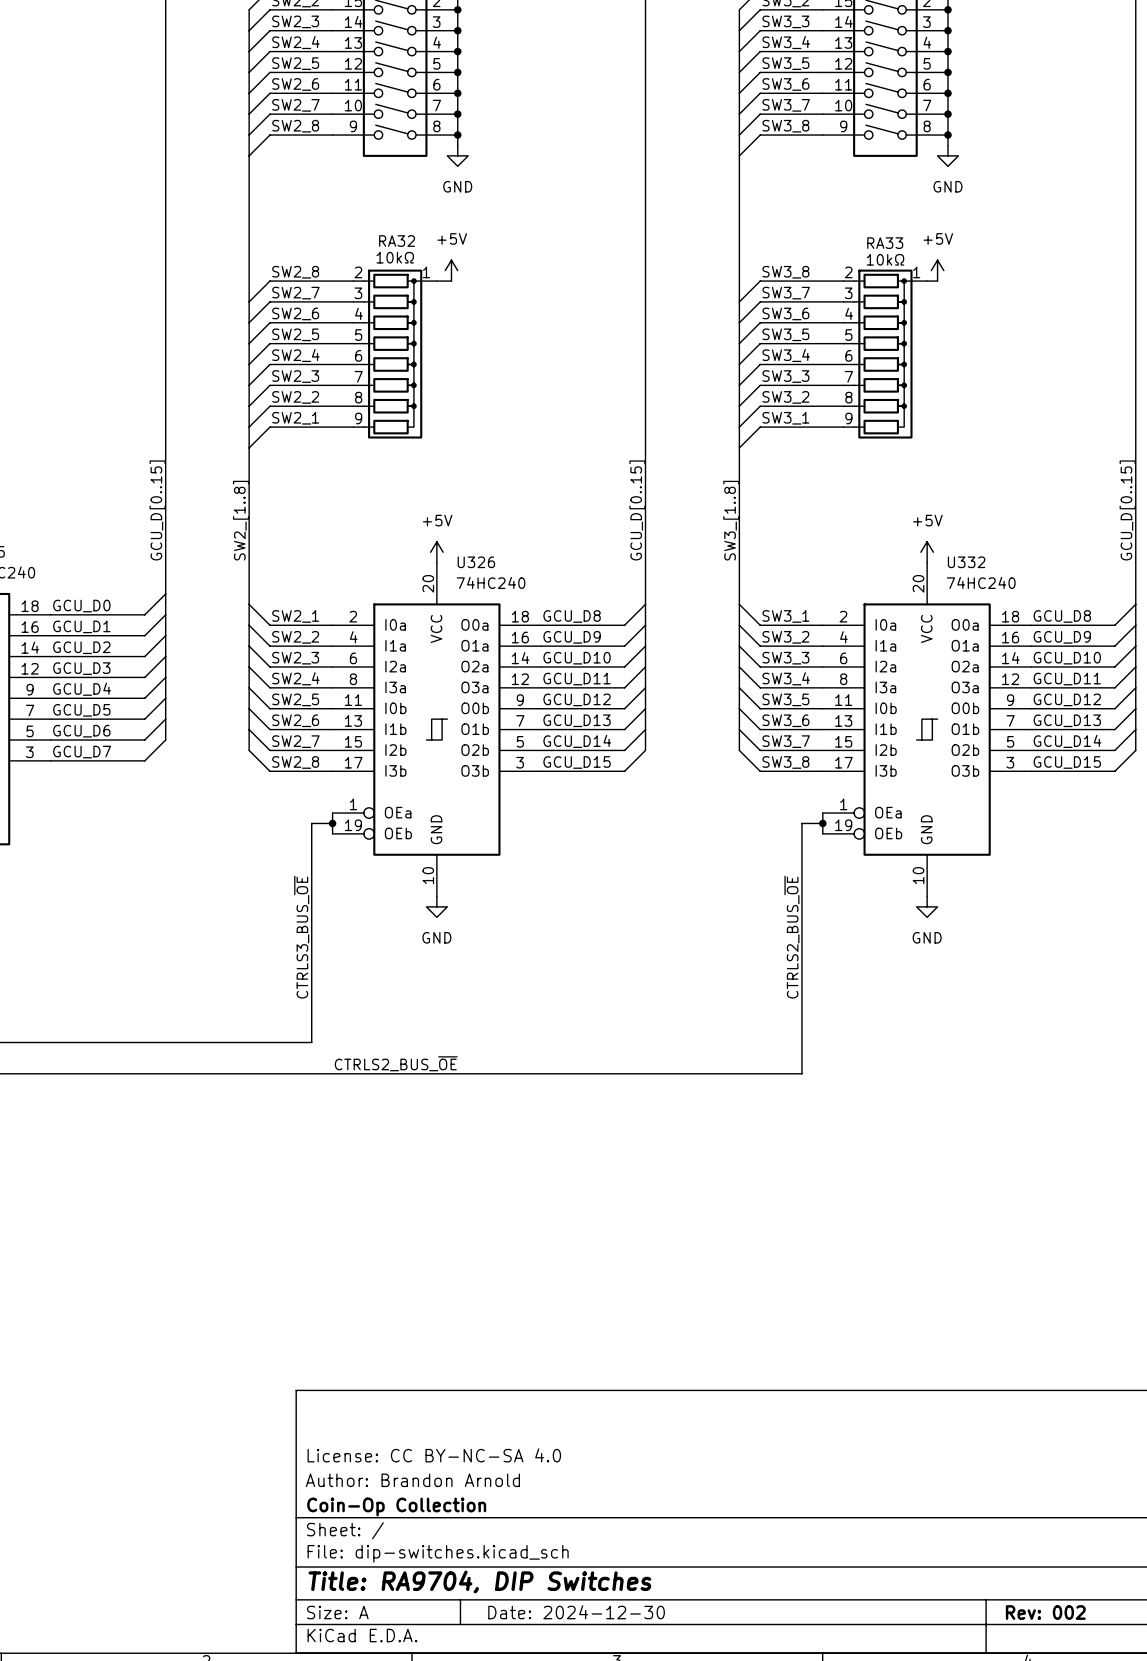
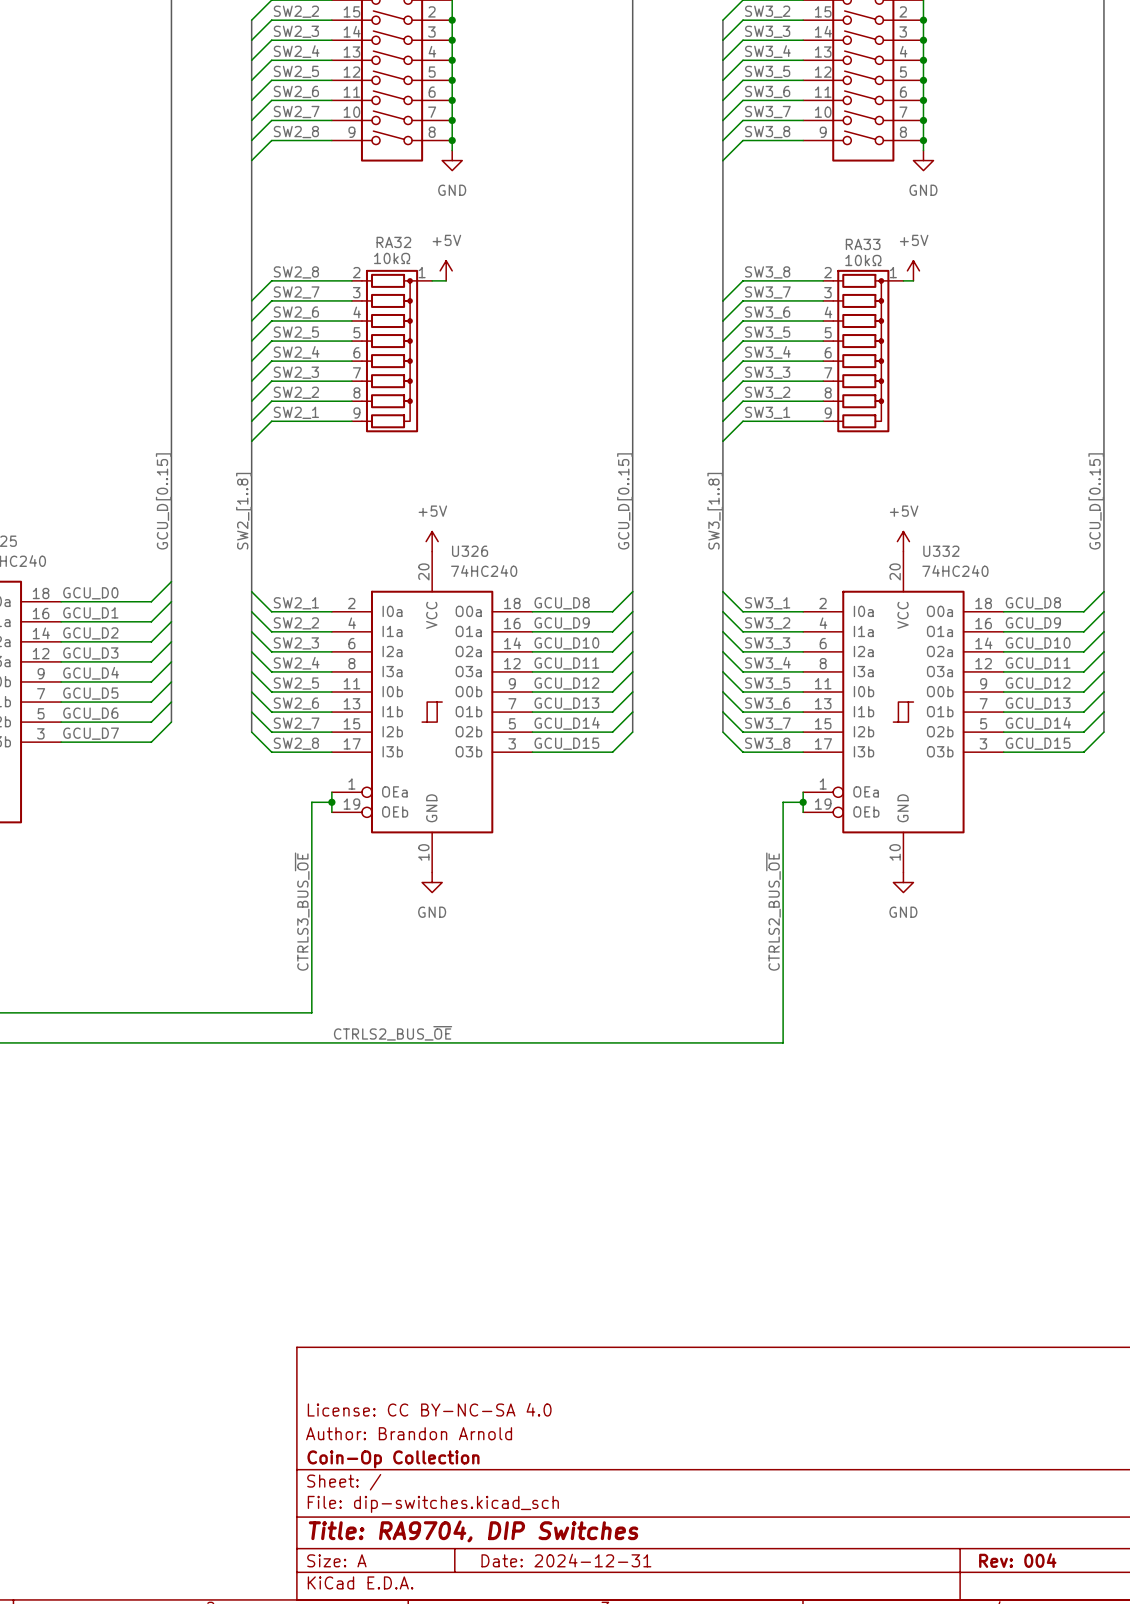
title block: Date: 2024-12-30 (576, 1612) -> Date: 2024-12-31 (566, 1560)
title block: Rev: 002 (1045, 1612) -> Rev: 004 (1017, 1560)

